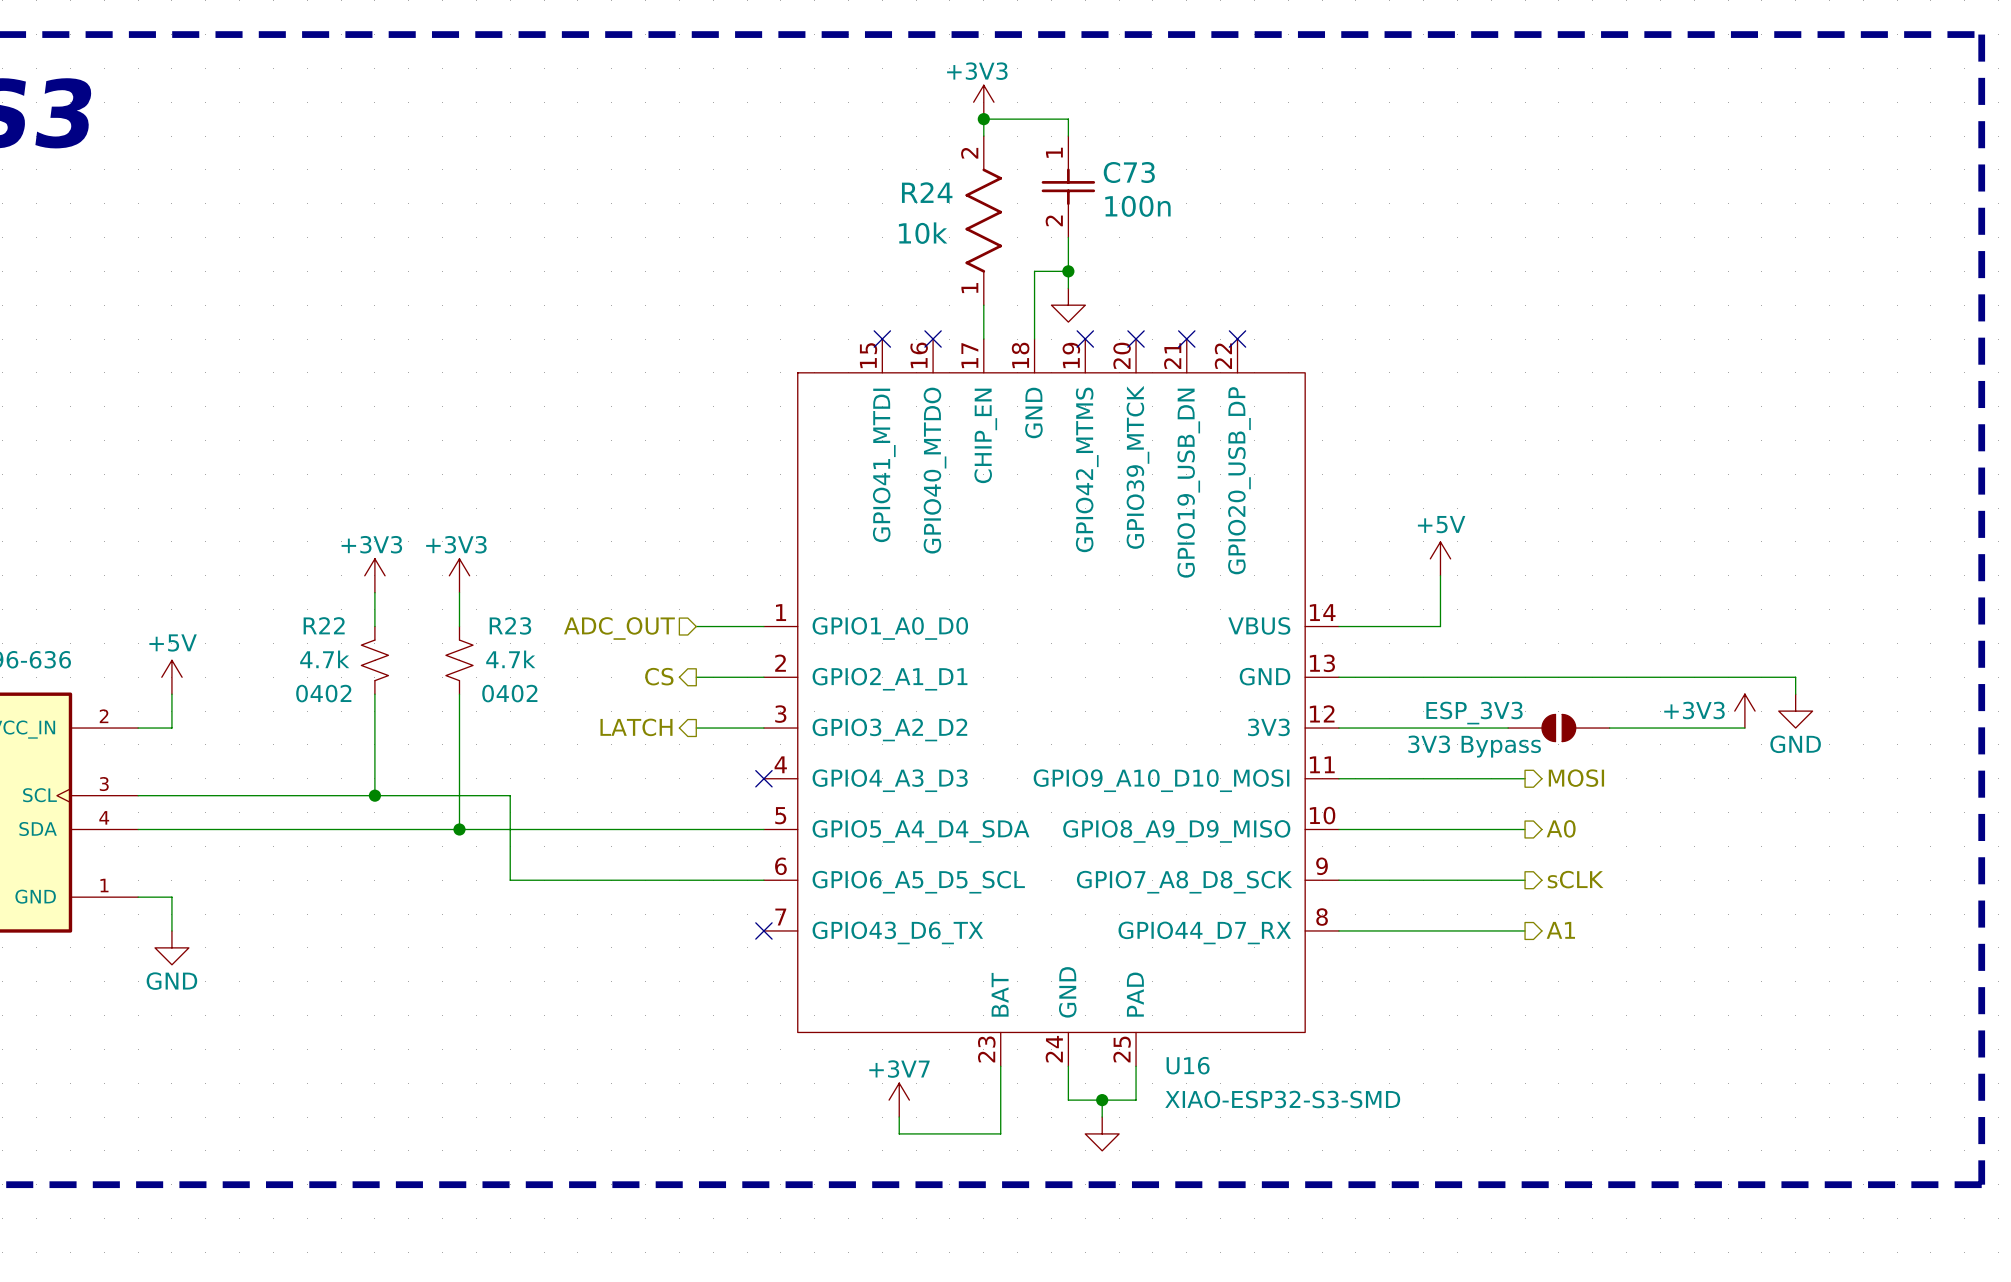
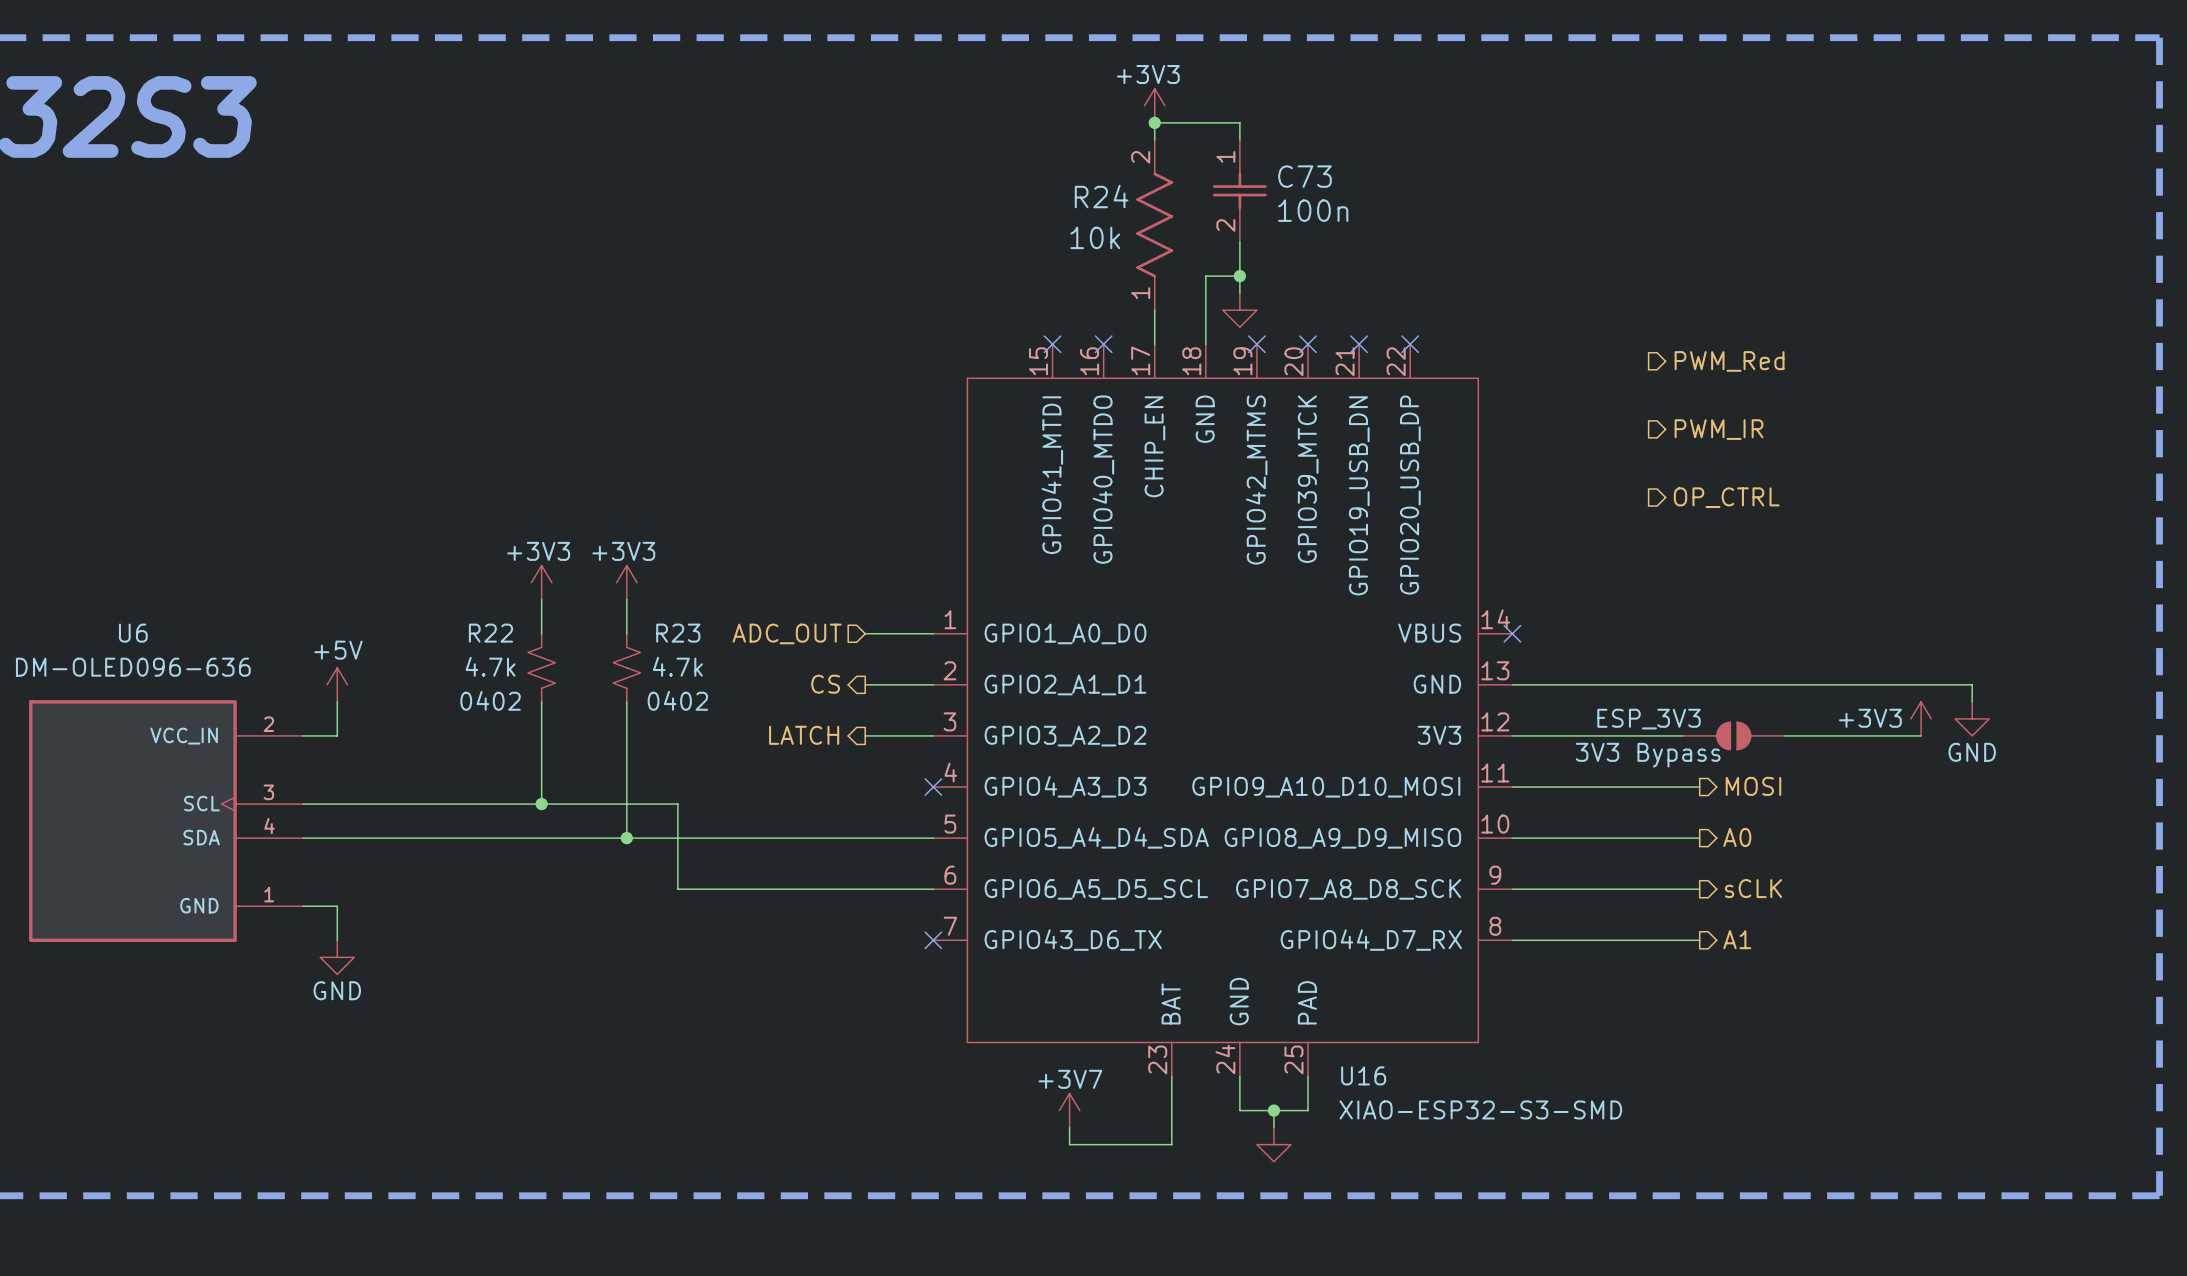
hierarchical label: none -> PWM_Red (1729, 361)
hierarchical label: none -> PWM_IR (1719, 429)
hierarchical label: none -> OP_CTRL (1726, 497)
power symbol: +5V (1440, 558) -> none
wire: (1440, 575) (1440, 626) (1338, 626) -> none
no-connect mark: none -> (1512, 633)

